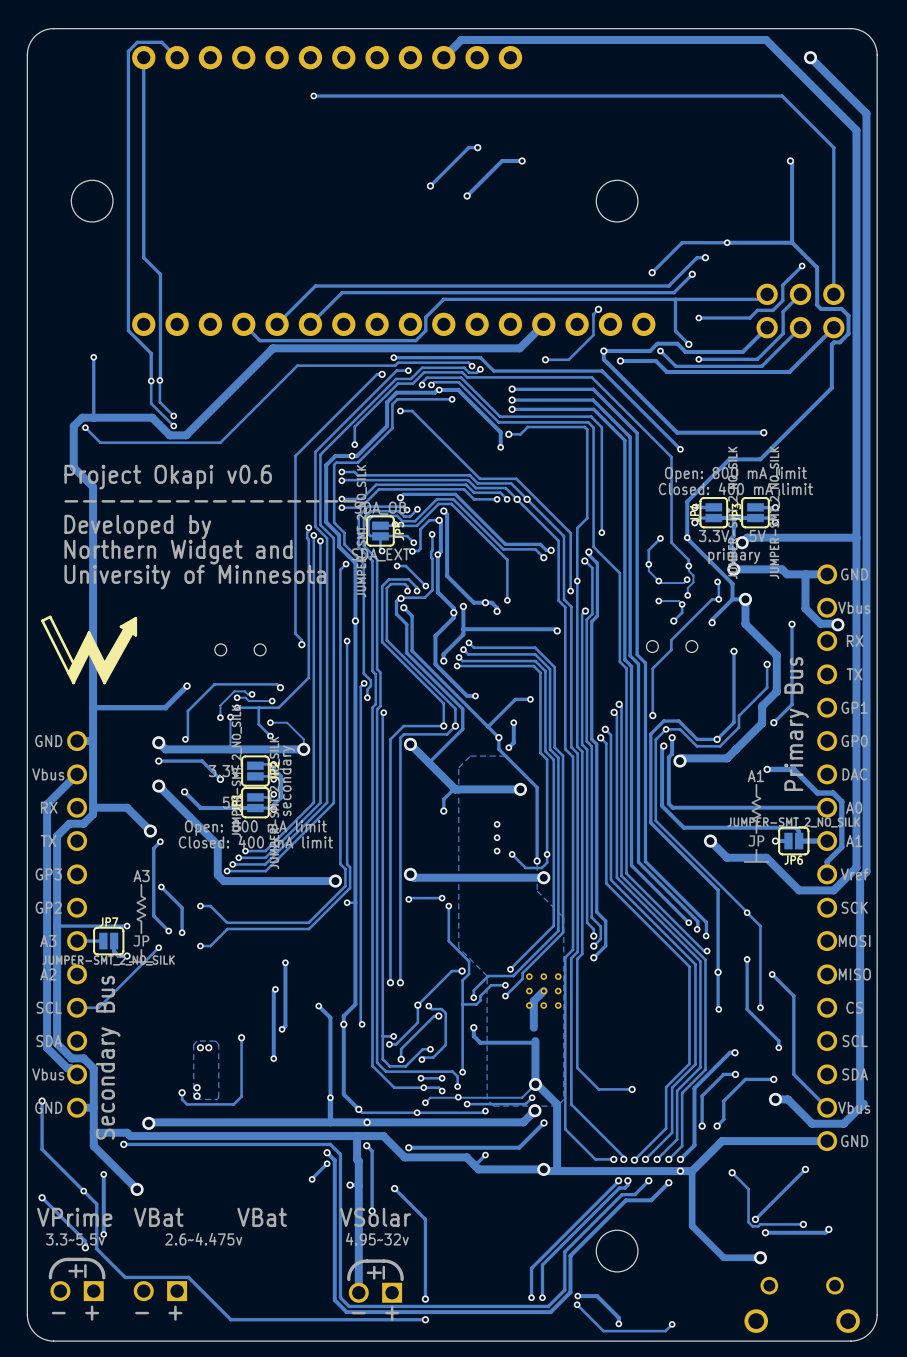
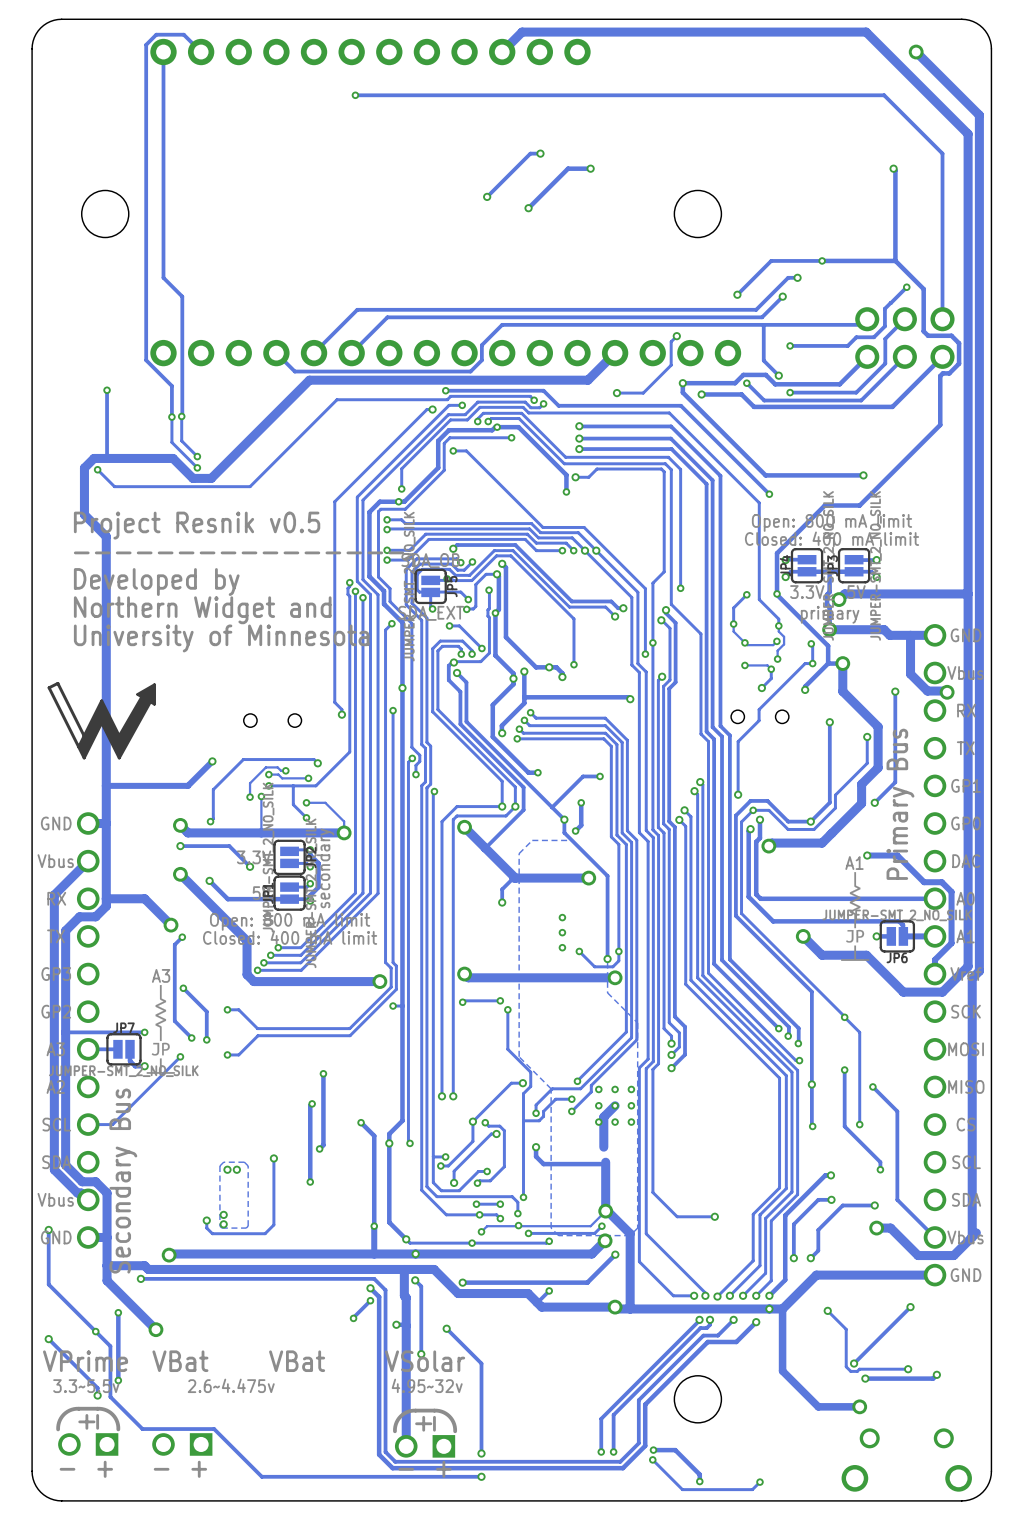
text: Project Okapi v0.6 (168, 477) -> Project Resnik v0.5 (197, 525)

